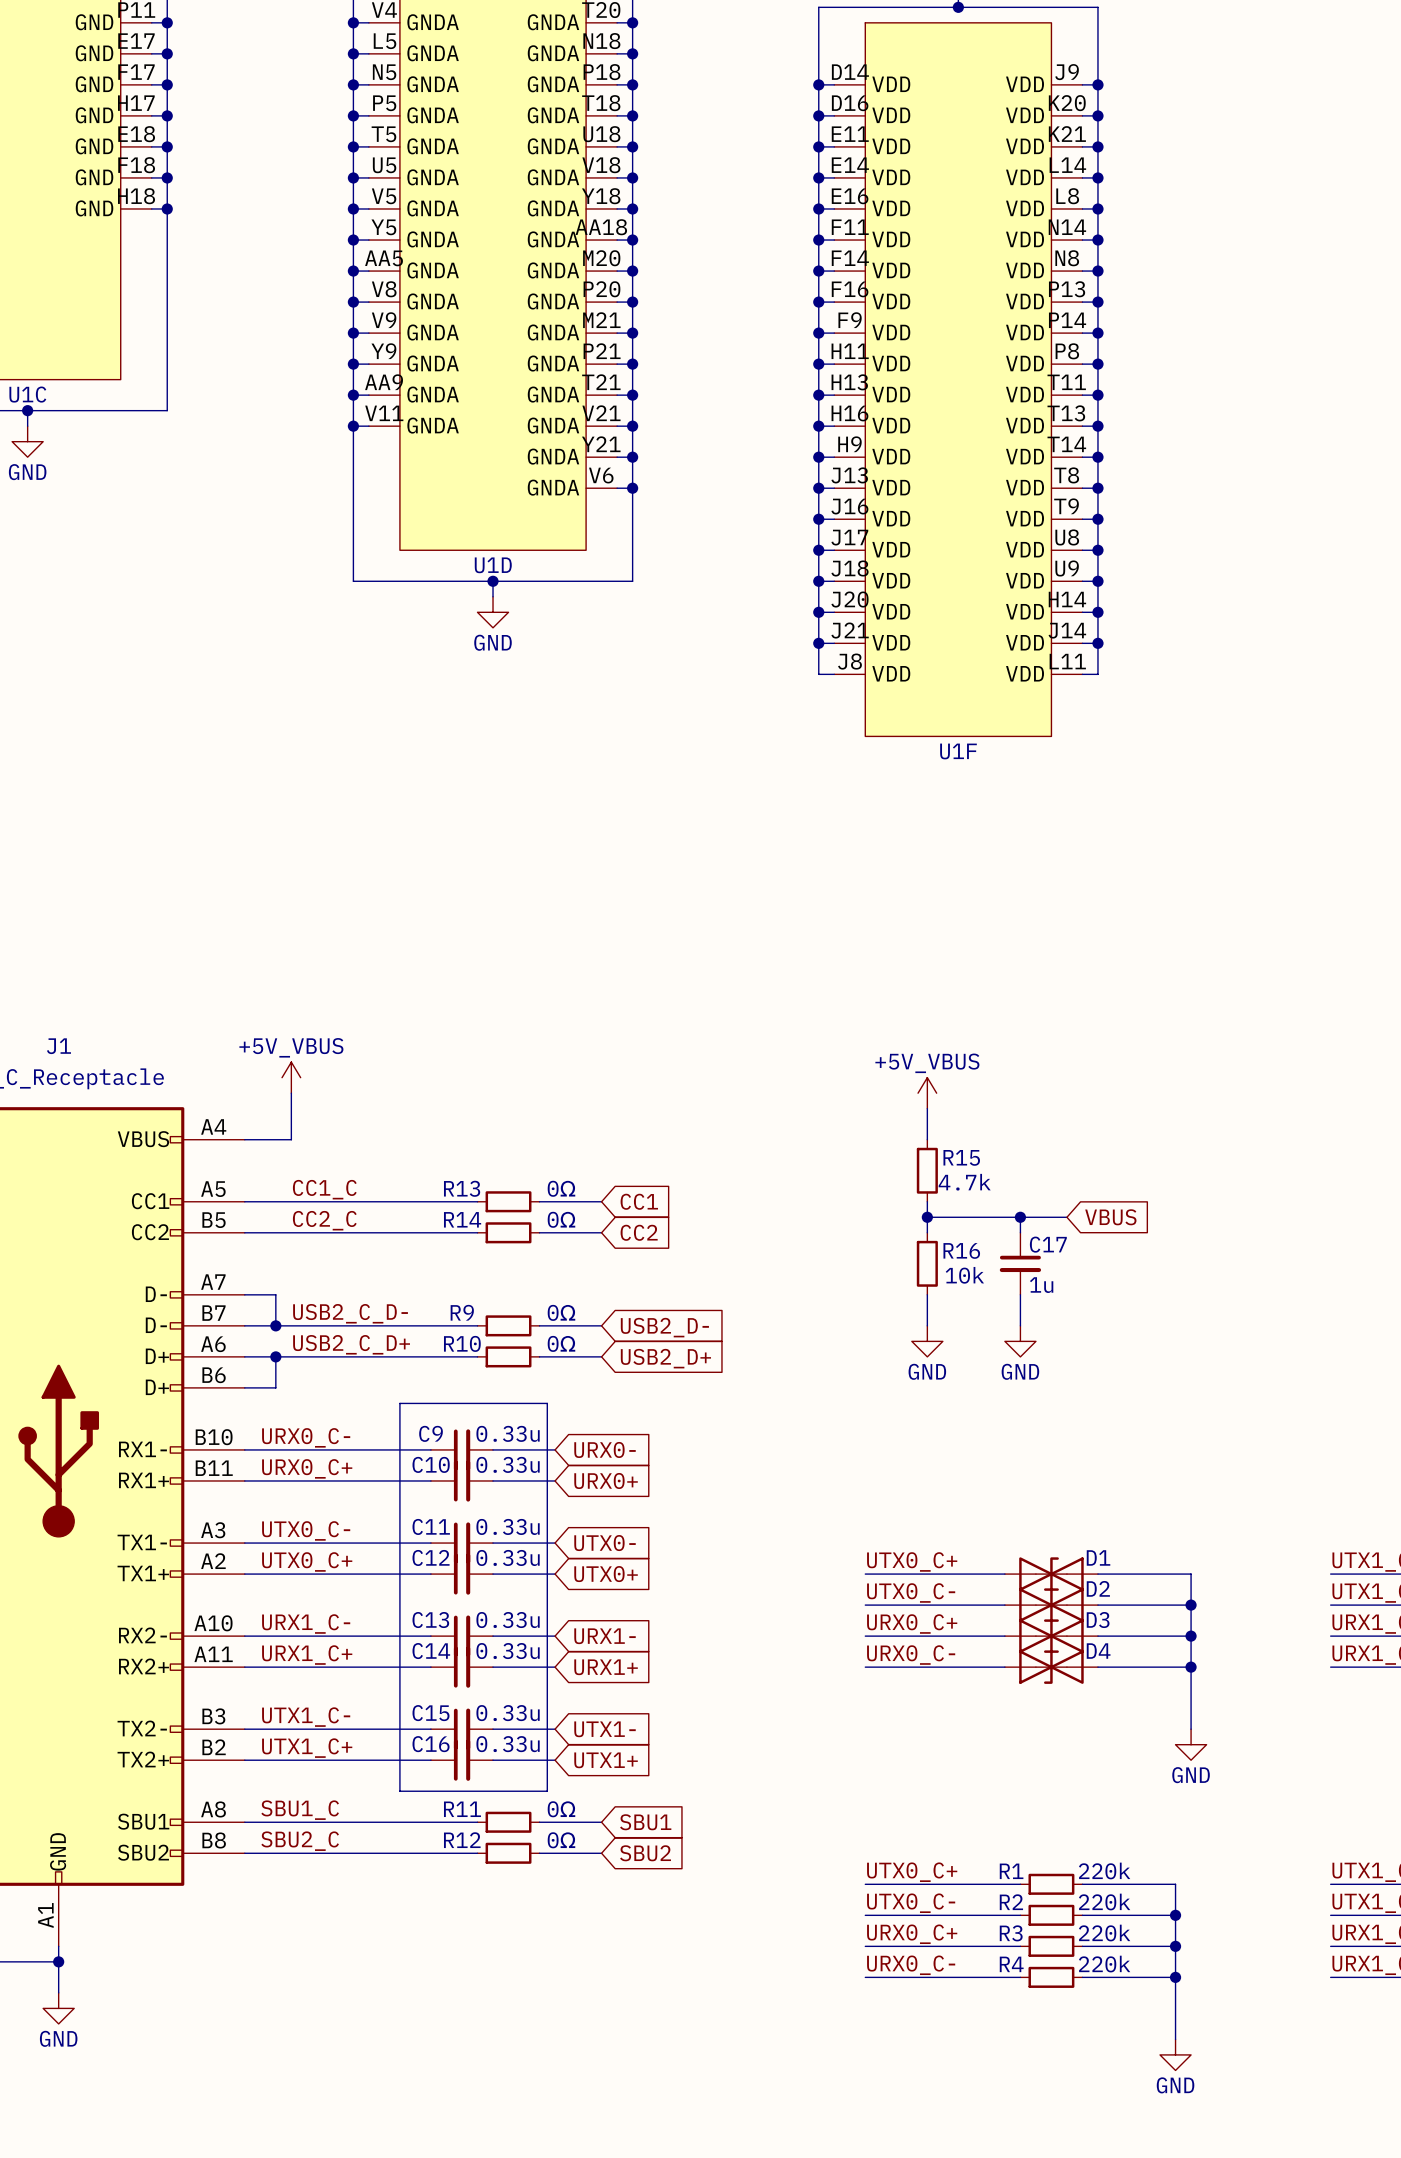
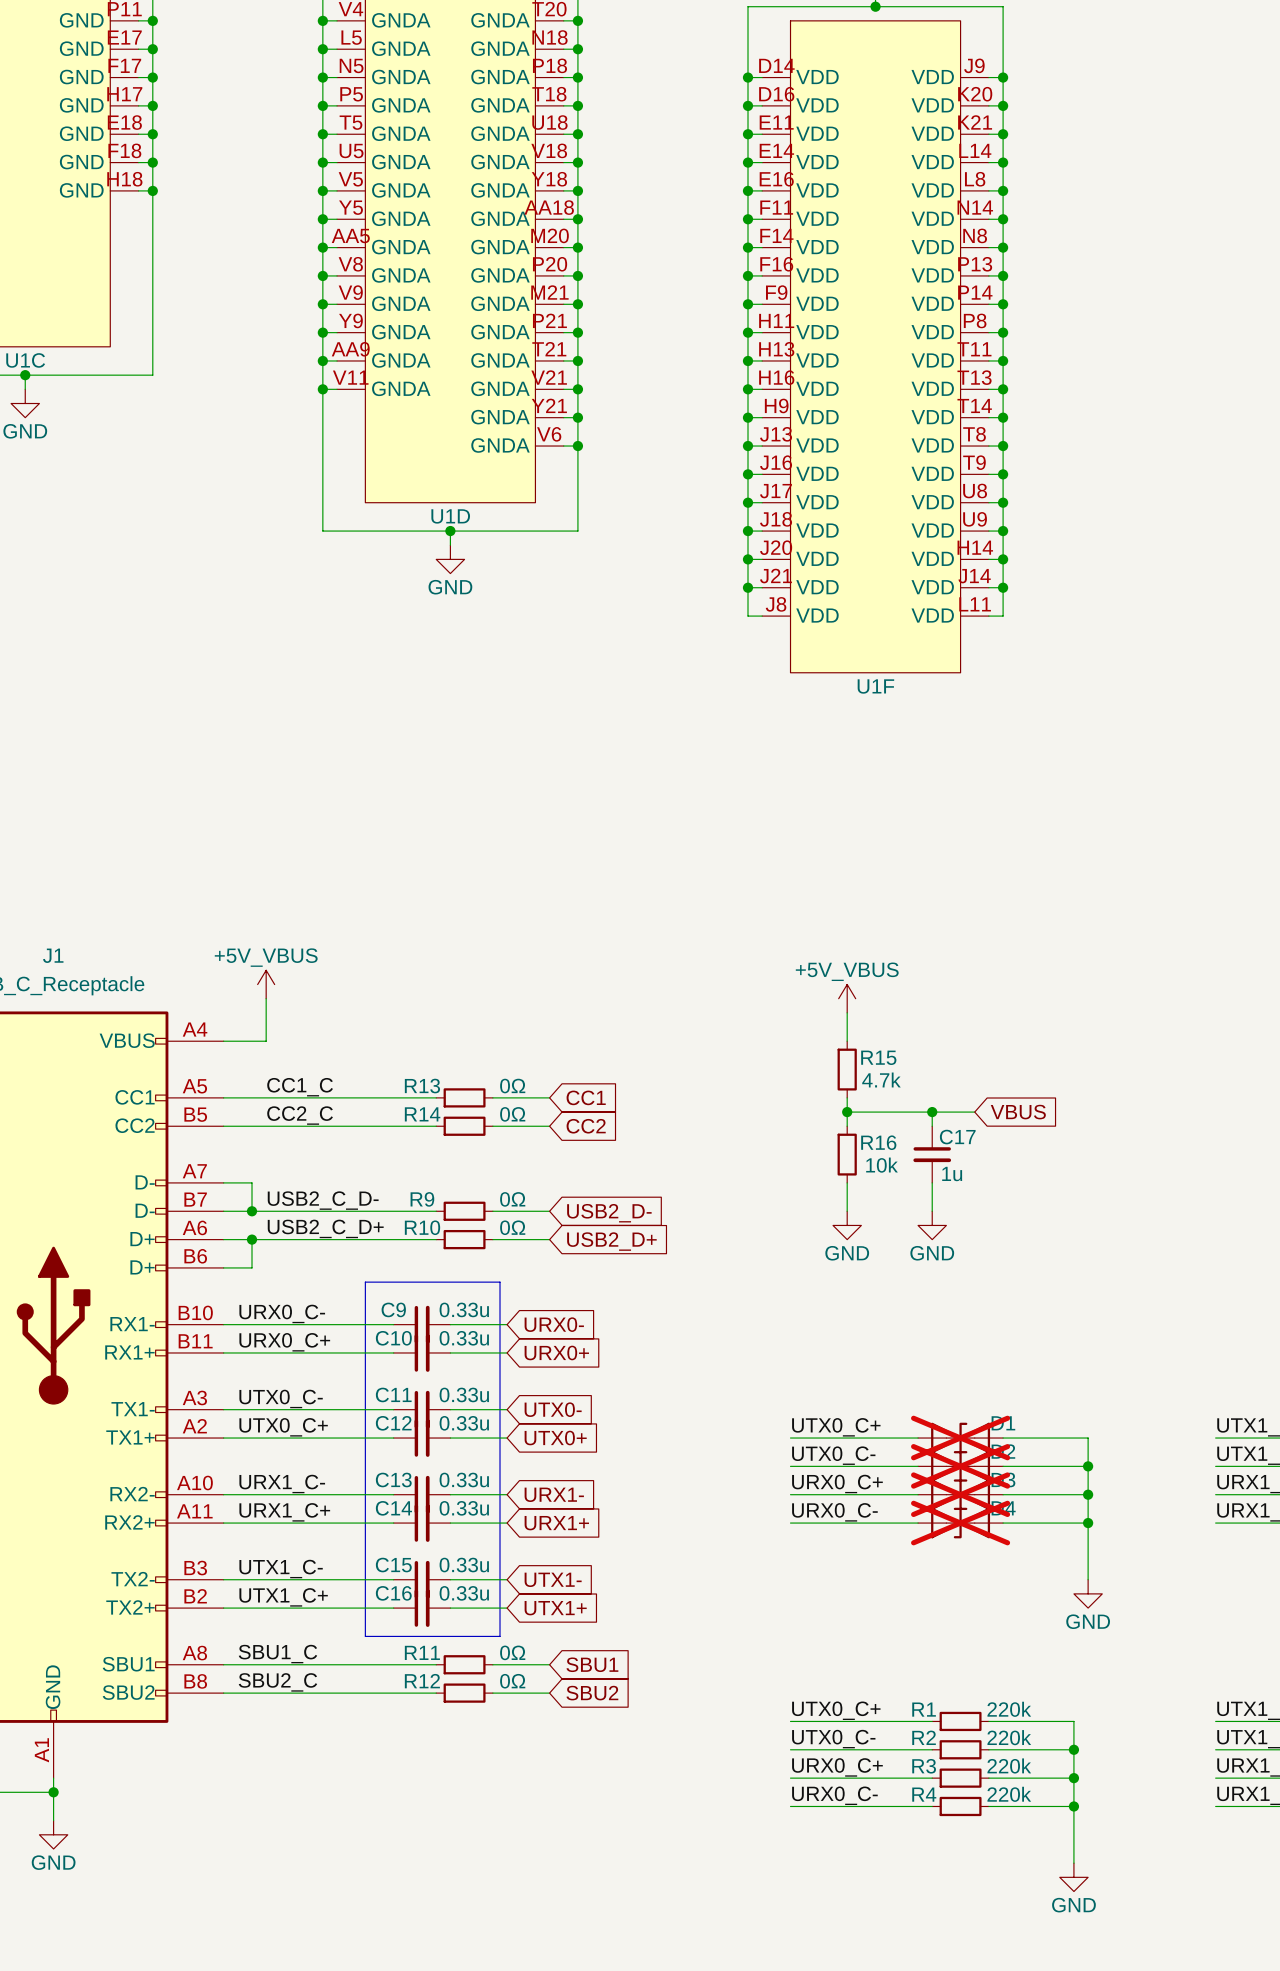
D1 do-not-place cross: none -> (960, 1438)
D2 do-not-place cross: none -> (960, 1466)
D3 do-not-place cross: none -> (960, 1494)
D4 do-not-place cross: none -> (960, 1523)

